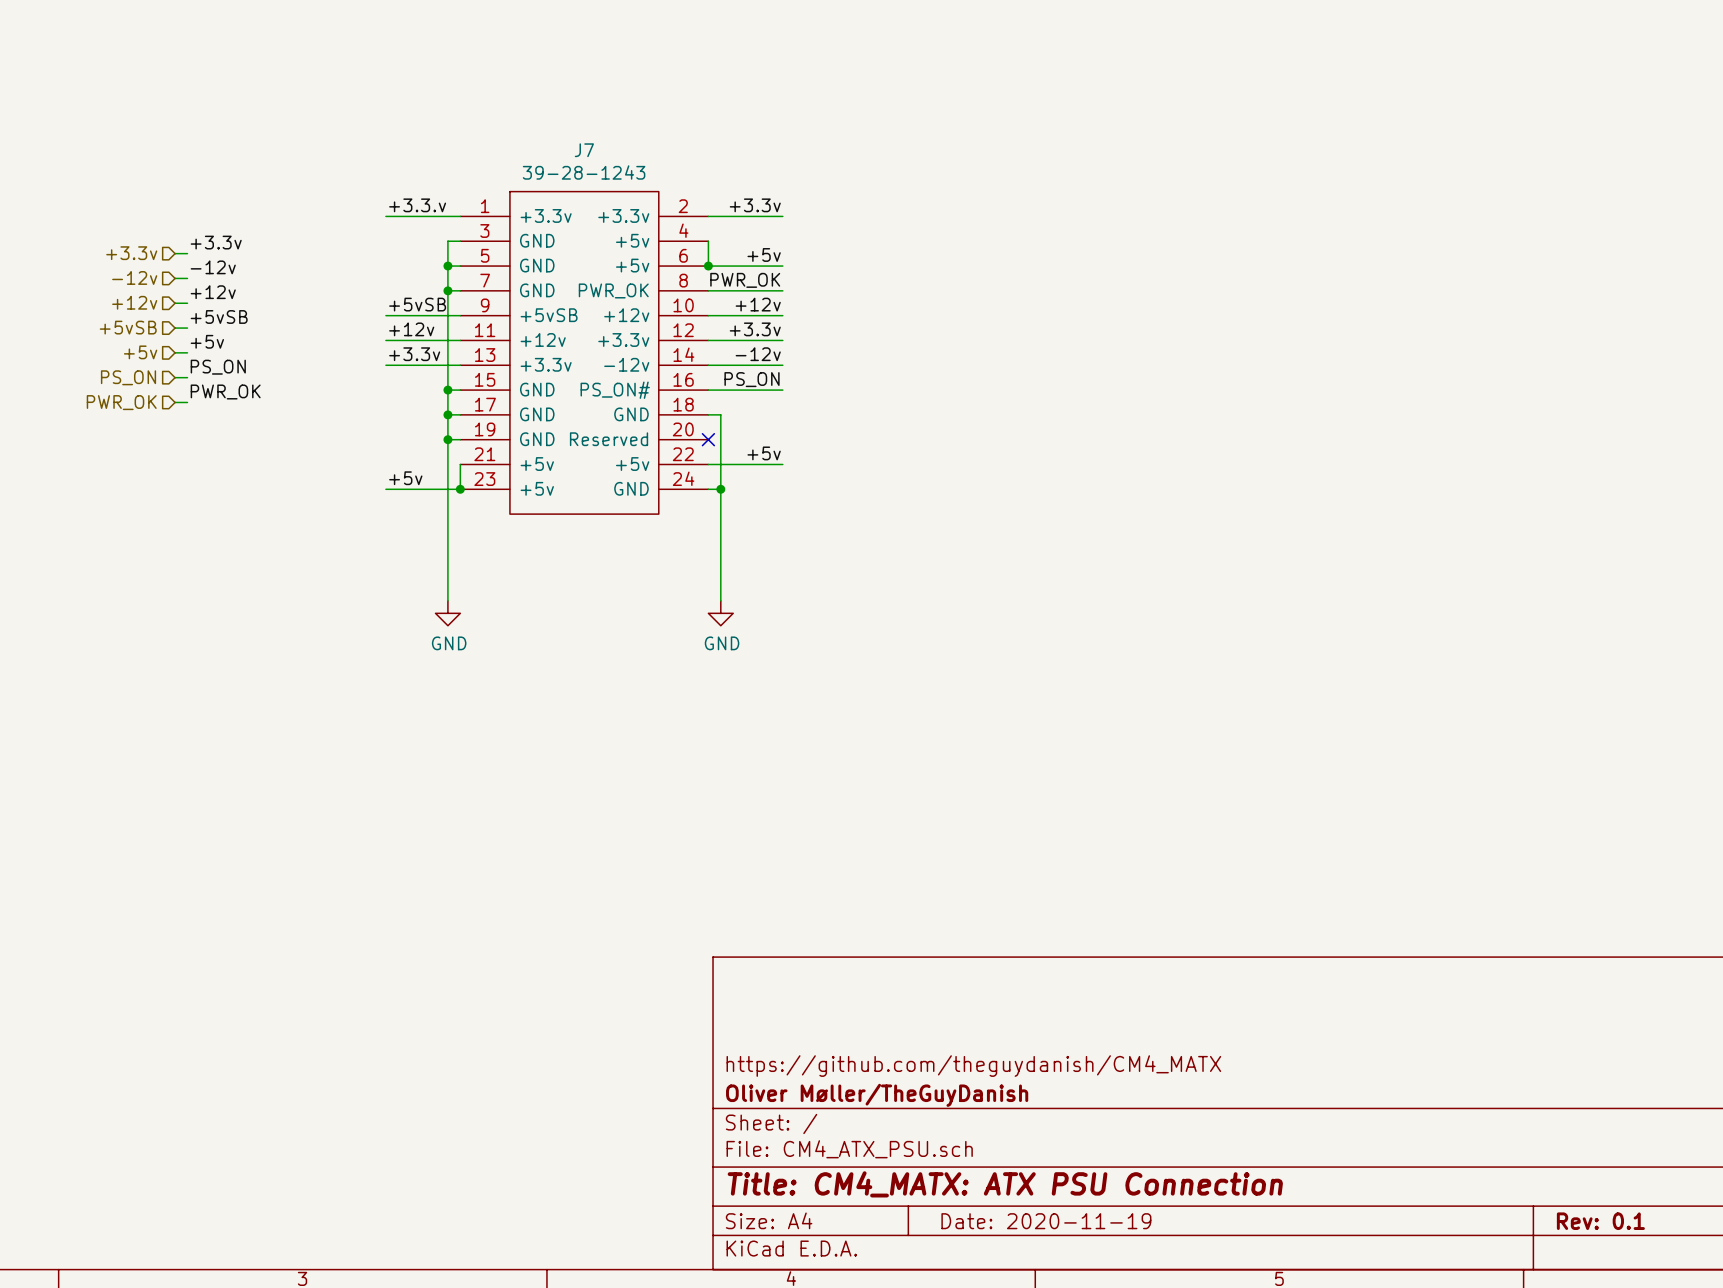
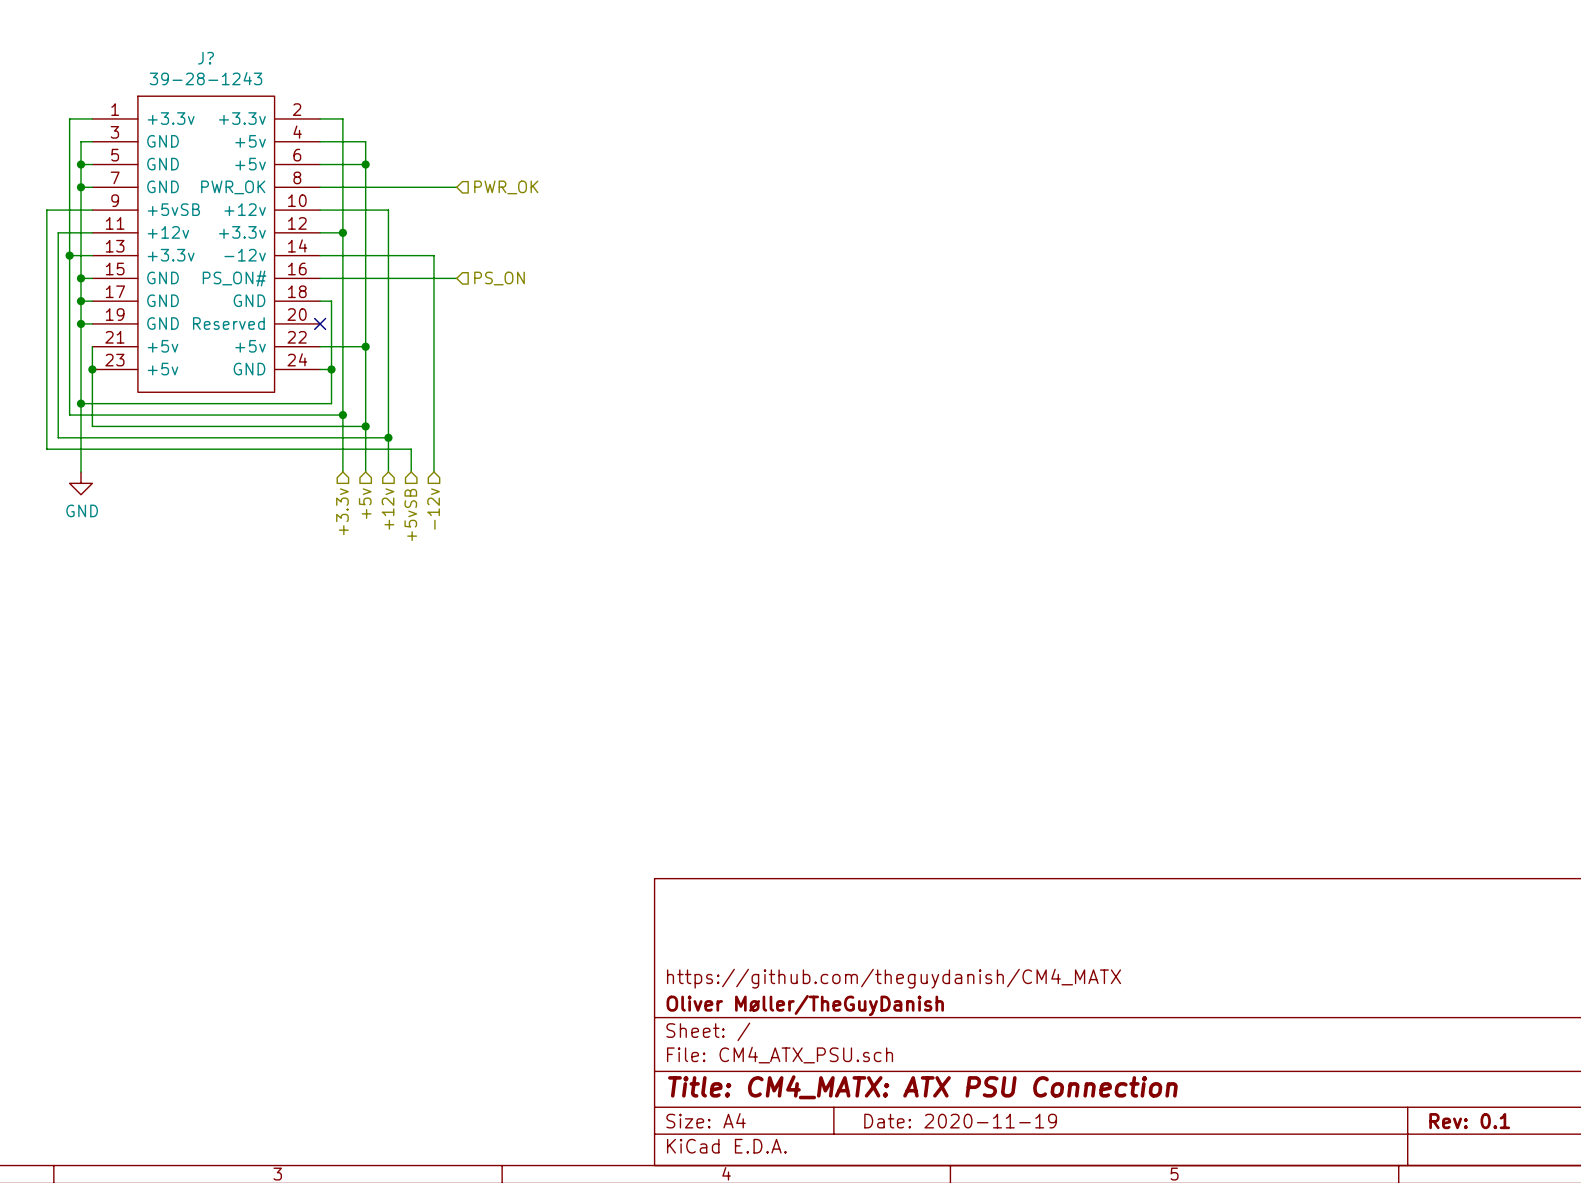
wire: none -> (92, 118) (69, 118) (69, 415) (342, 415)
wire: none -> (320, 118) (342, 118) (342, 471)
wire: none -> (92, 141) (81, 141) (81, 471)
wire: none -> (320, 141) (365, 141) (365, 471)
junction: none -> (81, 164)
wire: none -> (320, 164) (365, 164)
junction: none -> (365, 164)
junction: none -> (81, 187)
wire: none -> (320, 187) (456, 187)
hierarchical label: none -> PWR_OK (506, 187)
label: +3.3.v (417, 205) -> none
label: +3.3v (755, 205) -> none
wire: (385, 216) (460, 216) -> none
wire: (708, 216) (782, 216) -> none
wire: none -> (92, 210) (46, 210) (46, 449) (354, 449)
wire: none -> (320, 210) (388, 210) (388, 471)
wire: (460, 241) (447, 241) (447, 489) (460, 489) (460, 464) -> none
wire: (708, 241) (708, 266) (782, 266) -> none
label: +3.3v (216, 242) -> none
wire: none -> (92, 232) (58, 232) (58, 437) (388, 437)
hierarchical label: +3.3v (131, 253) -> none
wire: (175, 253) (187, 253) -> (81, 187) (92, 187)
wire: none -> (320, 232) (342, 232)
junction: none -> (342, 232)
label: +5v (764, 254) -> none
J?: none -> 39-28-1243 (206, 244)
wire: (447, 266) (460, 266) -> none
junction: (447, 266) -> none
junction: (708, 266) -> none
label: -12v (213, 267) -> none
hierarchical label: -12v (134, 277) -> none
wire: none -> (69, 255) (92, 255)
junction: none -> (69, 255)
wire: (175, 278) (187, 278) -> (81, 164) (92, 164)
wire: none -> (320, 255) (433, 255) (433, 471)
label: PWR_OK (745, 280) -> none
wire: (447, 290) (460, 290) -> none
junction: (447, 290) -> none
wire: (708, 290) (782, 290) -> none
label: +12v (213, 292) -> none
hierarchical label: +12v (134, 302) -> none
junction: none -> (81, 278)
wire: (175, 303) (187, 303) -> none
wire: none -> (320, 278) (456, 278)
hierarchical label: none -> PS_ON (499, 278)
label: +5vSB (417, 304) -> none
label: +12v (758, 304) -> none
wire: (385, 315) (460, 315) -> none
wire: (708, 315) (782, 315) -> none
label: +5vSB (219, 316) -> none
hierarchical label: +5vSB (128, 327) -> none
junction: none -> (81, 301)
wire: (175, 328) (187, 328) -> none
wire: none -> (320, 301) (331, 301) (331, 403) (81, 403)
label: +12v (411, 329) -> none
label: +3.3v (755, 329) -> none
wire: (385, 340) (460, 340) -> none
wire: (708, 340) (782, 340) -> none
label: +5v (207, 341) -> none
junction: none -> (81, 323)
hierarchical label: +5v (140, 352) -> none
wire: (175, 352) (187, 352) -> (81, 278) (92, 278)
no-connect mark: none -> (320, 323)
J7: 39-28-1243 (584, 352) -> none
label: +3.3v (414, 354) -> none
label: -12v (758, 354) -> none
wire: (385, 365) (460, 365) -> none
wire: (708, 365) (782, 365) -> none
label: PS_ON (218, 367) -> none
wire: none -> (92, 346) (92, 426) (365, 426)
hierarchical label: PS_ON (128, 377) -> none
wire: (175, 377) (187, 377) -> (81, 301) (92, 301)
wire: none -> (320, 346) (365, 346)
junction: none -> (365, 346)
label: PS_ON (752, 379) -> none
wire: (447, 390) (460, 390) -> (320, 369) (331, 369)
junction: (447, 390) -> none
wire: (708, 390) (782, 390) -> none
label: PWR_OK (225, 391) -> none
junction: none -> (92, 369)
hierarchical label: PWR_OK (121, 402) -> none
wire: (175, 402) (187, 402) -> (81, 323) (92, 323)
junction: none -> (331, 369)
wire: (447, 414) (460, 414) -> none
junction: (447, 414) -> none
wire: (708, 414) (720, 414) (720, 600) -> none
junction: none -> (81, 403)
wire: (447, 439) (460, 439) -> none
junction: (447, 439) -> none
no-connect mark: (708, 439) -> none
junction: none -> (342, 415)
label: +5v (764, 453) -> none
junction: none -> (365, 426)
wire: (708, 464) (782, 464) -> none
junction: none -> (388, 437)
label: +5v (405, 478) -> none
junction: (460, 489) -> none
wire: (708, 489) (720, 489) -> none
junction: (720, 489) -> none
wire: (447, 514) (447, 600) -> none
power symbol: none -> GND (81, 483)
hierarchical label: none -> +5v (365, 503)
hierarchical label: none -> +12v (388, 509)
hierarchical label: none -> -12v (433, 509)
hierarchical label: none -> +3.3v (342, 511)
hierarchical label: none -> +5vSB (410, 514)
power symbol: GND (447, 613) -> none
power symbol: GND (720, 613) -> none

